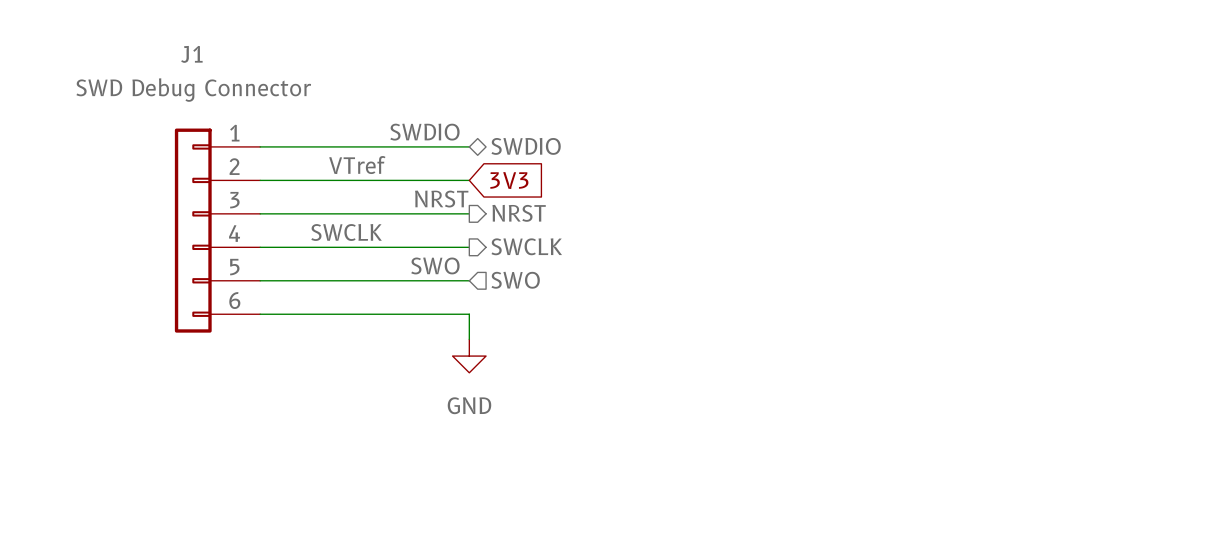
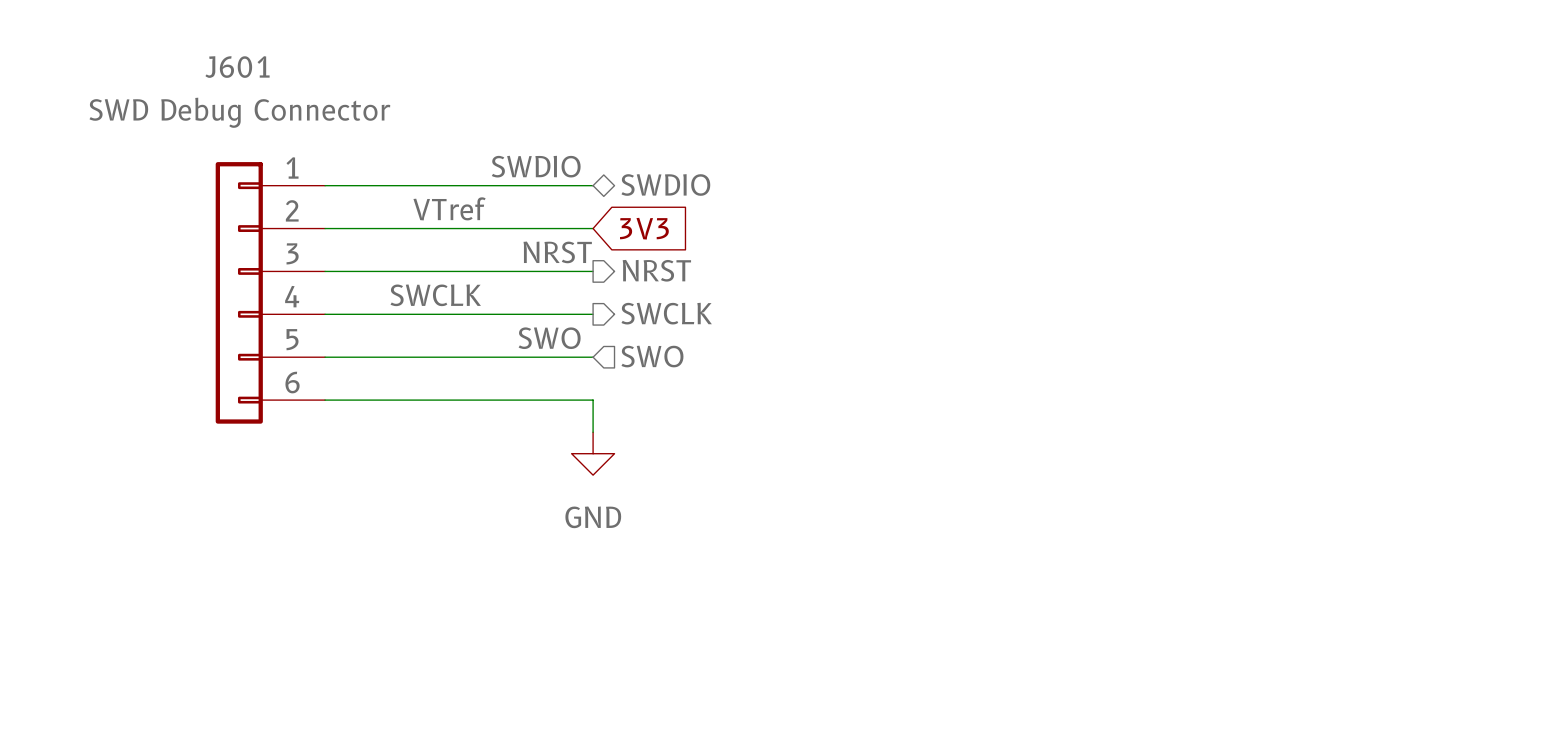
J1 name: J1 (191, 54) -> J601 (237, 67)

